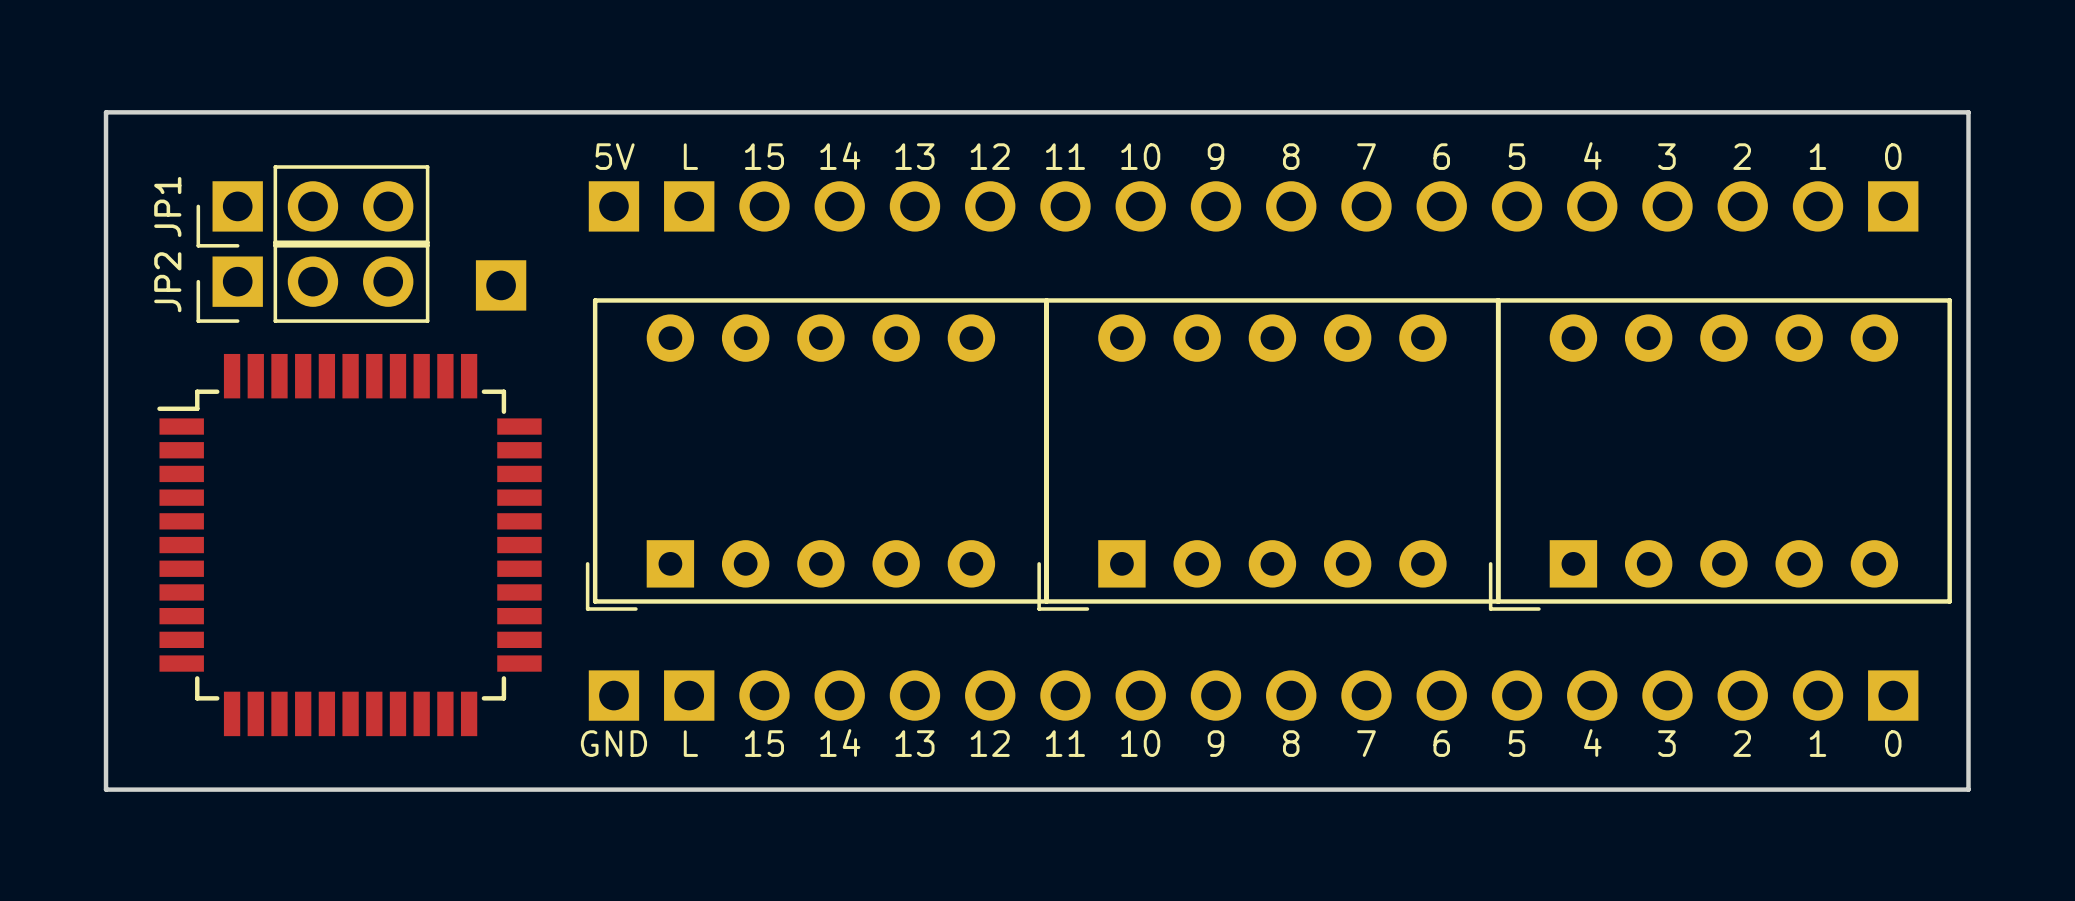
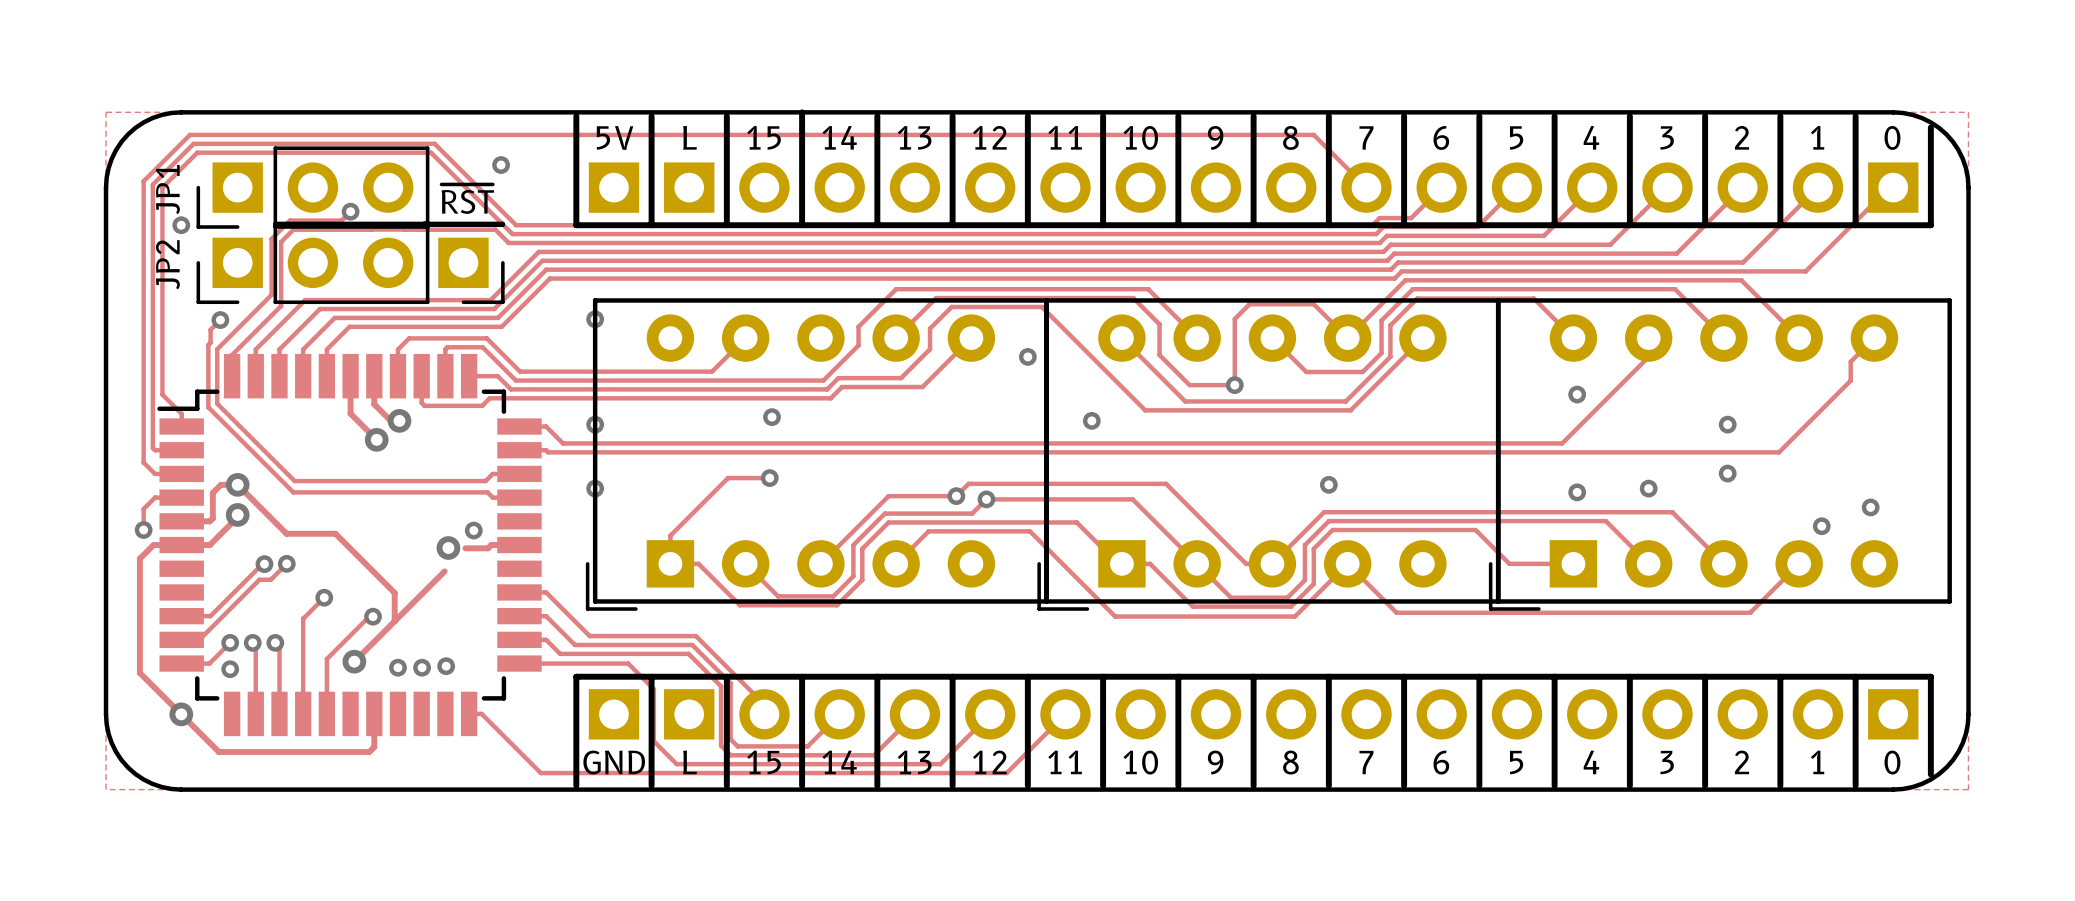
board edge: (181, 112) (106, 112) (106, 187) -> (181, 112) (152, 118) (128, 134) (111, 158) (106, 187)
line: none -> (802, 112) (802, 225)
board edge: (1893, 112) (1968, 112) (1968, 187) -> (1893, 112) (1922, 118) (1946, 134) (1962, 158) (1968, 187)
line: none -> (576, 116) (576, 225) (1930, 225) (1930, 127)
line: none -> (651, 116) (651, 225)
line: none -> (726, 116) (726, 225)
line: none -> (877, 116) (877, 225)
line: none -> (952, 116) (952, 225)
line: none -> (1027, 116) (1027, 225)
line: none -> (1103, 116) (1103, 225)
line: none -> (1178, 116) (1178, 225)
line: none -> (1253, 116) (1253, 225)
line: none -> (1328, 116) (1328, 225)
line: none -> (1404, 116) (1404, 225)
line: none -> (1479, 116) (1479, 225)
line: none -> (1554, 116) (1554, 225)
line: none -> (1629, 116) (1629, 225)
line: none -> (1705, 116) (1705, 225)
line: none -> (1780, 116) (1780, 225)
line: none -> (1855, 116) (1855, 225)
text position: 5V (615, 156) -> 5V (615, 137)
text position: L (690, 156) -> L (690, 137)
text position: 15 (764, 156) -> 15 (764, 137)
text position: 14 (840, 156) -> 14 (839, 137)
text position: 13 (914, 156) -> 13 (914, 137)
text position: 12 (990, 156) -> 12 (989, 137)
text position: 11 (1065, 156) -> 11 (1065, 137)
text position: 10 (1140, 156) -> 10 (1140, 137)
text position: 9 (1215, 156) -> 9 (1215, 137)
text position: 8 (1291, 156) -> 8 (1290, 137)
text position: 7 (1366, 156) -> 7 (1366, 137)
text position: 6 (1441, 156) -> 6 (1441, 137)
text position: 5 (1516, 156) -> 5 (1516, 137)
text position: 4 (1592, 156) -> 4 (1591, 137)
text position: 3 (1666, 156) -> 3 (1667, 137)
text position: 2 (1742, 156) -> 2 (1742, 137)
text position: 1 (1817, 156) -> 1 (1817, 137)
text position: 0 (1893, 156) -> 0 (1892, 137)
via: none -> (501, 165)
track: none -> (1366, 187) (1313, 134) (189, 134) (143, 181) (143, 462) (155, 473) (181, 473)
track: none -> (1441, 187) (1411, 218) (1379, 218) (1372, 225) (516, 225) (434, 143) (193, 143) (152, 184) (152, 448) (155, 450) (181, 450)
track: none -> (1516, 187) (1477, 226) (1383, 226) (1376, 234) (512, 234) (431, 152) (197, 152) (162, 187) (162, 394) (181, 413) (181, 426)
track: none -> (1592, 187) (1543, 235) (1387, 235) (1379, 243) (508, 243) (495, 229) (404, 229)
track: none -> (1667, 187) (1610, 244) (1390, 244) (1383, 251) (538, 251) (490, 300) (305, 300) (255, 349) (255, 376)
track: none -> (1742, 187) (1676, 253) (1394, 253) (1387, 260) (542, 260) (494, 309) (319, 309) (279, 349) (279, 376)
track: none -> (1817, 187) (1743, 262) (1398, 262) (1390, 269) (546, 269) (498, 317) (334, 317) (303, 349) (303, 376)
track: none -> (1893, 187) (1889, 187) (1805, 271) (1401, 271) (1394, 278) (549, 278) (501, 326) (349, 326) (326, 349) (326, 376)
text: none -> ~{RST} (467, 199)
JP1 position: (312, 206) -> (312, 187)
part position: (613, 206) -> (613, 187)
part position: (689, 206) -> (689, 187)
part position: (1328, 206) -> (1328, 187)
track: none -> (350, 211) (341, 220) (289, 220) (271, 238) (271, 294) (217, 349) (217, 403) (294, 481) (485, 481) (492, 473) (519, 473)
via: none -> (350, 211)
via: none -> (181, 225)
track: none -> (371, 229) (293, 229) (281, 242) (281, 305) (232, 355) (232, 376)
track: none -> (372, 229) (404, 229)
JP2 position: (312, 281) -> (312, 262)
part side: bottom (501, 285) -> top (463, 262)
via: none -> (595, 319)
track: none -> (220, 320) (210, 329) (210, 342) (208, 344) (208, 407) (293, 492) (487, 492) (492, 497) (519, 497)
via: none -> (220, 320)
track: none -> (745, 338) (712, 371) (520, 371) (486, 338) (409, 338) (397, 349) (397, 376)
track: none -> (896, 338) (936, 298) (1133, 298) (1159, 324) (1159, 355) (1189, 385) (1234, 385) (1234, 319) (1249, 304) (1313, 304) (1347, 338) (1405, 280) (1741, 280) (1799, 338)
track: none -> (971, 338) (922, 387) (842, 387) (830, 398) (489, 398) (482, 405) (424, 405) (421, 402) (421, 376)
track: none -> (1121, 338) (1185, 401) (1345, 401) (1390, 356) (1390, 325) (1417, 298) (1533, 298) (1573, 338)
track: none -> (1197, 338) (1148, 289) (896, 289) (858, 326) (858, 345) (823, 380) (515, 380) (482, 347) (447, 347) (445, 349) (445, 376)
track: none -> (1272, 338) (1306, 371) (1362, 371) (1381, 353) (1381, 320) (1412, 289) (1675, 289) (1723, 338)
track: none -> (1422, 338) (1350, 410) (1145, 410) (1041, 306) (951, 306) (930, 328) (930, 349) (901, 378) (838, 378) (827, 389) (511, 389) (497, 376) (469, 376)
track: none -> (1648, 338) (1648, 356) (1562, 443) (563, 443) (546, 426) (519, 426)
track: none -> (1874, 338) (1850, 361) (1850, 380) (1779, 452) (548, 452) (546, 450) (519, 450)
via: none -> (1027, 356)
track: none -> (350, 376) (350, 413) (376, 439)
track: none -> (374, 376) (374, 404) (390, 420) (399, 420)
via: none -> (1234, 385)
via: none -> (1577, 394)
via: none -> (771, 417)
via: none -> (399, 420)
via: none -> (1091, 420)
via: none -> (595, 424)
via: none -> (1727, 424)
via: none -> (376, 439)
via: none -> (1727, 473)
track: none -> (769, 478) (728, 478) (670, 535) (670, 563) (698, 563) (739, 605) (837, 605) (862, 579) (862, 548) (888, 522) (1076, 522) (1118, 563) (1150, 563) (1192, 606) (1291, 606) (1313, 583) (1313, 548) (1332, 529) (1475, 529) (1509, 563) (1573, 563)
via: none -> (769, 478)
via: none -> (237, 484)
via: none -> (1328, 484)
via: none -> (595, 488)
via: none -> (1648, 488)
via: none -> (1577, 492)
via: none -> (956, 496)
track: none -> (181, 497) (155, 497) (143, 509) (143, 529)
via: none -> (986, 499)
via: none -> (1870, 507)
track: none -> (237, 514) (237, 517) (209, 545) (153, 545) (139, 558) (139, 672) (218, 751) (369, 751) (374, 747) (374, 713)
via: none -> (237, 514)
track: none -> (181, 521) (209, 521) (212, 518) (212, 492) (220, 484) (237, 484) (286, 533) (335, 533) (394, 592) (394, 621)
via: none -> (1821, 526)
via: none -> (143, 529)
via: none -> (473, 530)
track: none -> (519, 545) (491, 545) (488, 548) (465, 548)
via: none -> (448, 548)
track: none -> (286, 563) (270, 579) (259, 579) (199, 639) (181, 639)
via: none -> (286, 563)
track: none -> (745, 563) (778, 596) (833, 596) (853, 576) (853, 545) (884, 513) (972, 513) (986, 499) (1132, 499) (1231, 597) (1287, 597) (1304, 580) (1304, 545) (1328, 521) (1605, 521) (1648, 563)
track: none -> (820, 563) (888, 496) (956, 496) (968, 483) (1166, 483) (1246, 563) (1272, 563) (1324, 512) (1672, 512) (1723, 563)
track: none -> (896, 563) (928, 531) (1030, 531) (1115, 616) (1294, 616) (1347, 563) (1396, 612) (1750, 612) (1799, 563)
track: none -> (264, 564) (210, 616) (181, 616)
via: none -> (264, 564)
track: none -> (444, 571) (350, 665)
track: none -> (519, 592) (546, 592) (589, 636) (695, 636) (764, 704) (764, 714)
track: none -> (324, 597) (303, 618) (303, 713)
via: none -> (324, 597)
track: none -> (373, 616) (369, 616) (326, 659) (326, 713)
via: none -> (373, 616)
track: none -> (519, 616) (546, 616) (574, 644) (692, 644) (730, 683) (730, 739) (737, 746) (807, 746) (839, 714)
track: none -> (519, 639) (546, 639) (560, 653) (688, 653) (721, 686) (721, 745) (730, 755) (874, 755) (914, 714)
track: none -> (230, 642) (209, 663) (181, 663)
via: none -> (230, 642)
track: none -> (252, 642) (255, 645) (255, 713)
via: none -> (252, 642)
track: none -> (275, 642) (279, 647) (279, 713)
via: none -> (275, 642)
via: none -> (354, 661)
track: none -> (519, 663) (628, 663) (653, 689) (653, 741) (676, 764) (940, 764) (990, 714)
via: none -> (446, 666)
via: none -> (397, 667)
via: none -> (422, 667)
via: none -> (230, 669)
line: none -> (651, 676) (651, 785)
line: none -> (726, 676) (726, 785)
line: none -> (802, 676) (802, 785)
line: none -> (877, 676) (877, 785)
line: none -> (952, 676) (952, 785)
line: none -> (1027, 676) (1027, 785)
line: none -> (1103, 676) (1103, 785)
line: none -> (1178, 676) (1178, 785)
line: none -> (1253, 676) (1253, 785)
line: none -> (1328, 676) (1328, 785)
line: none -> (1404, 676) (1404, 785)
line: none -> (1479, 676) (1479, 785)
line: none -> (1554, 676) (1554, 785)
line: none -> (1629, 676) (1629, 785)
line: none -> (1705, 676) (1705, 785)
line: none -> (1780, 676) (1780, 785)
line: none -> (1855, 676) (1855, 785)
part position: (613, 695) -> (613, 714)
part position: (689, 695) -> (689, 714)
part position: (1328, 695) -> (1328, 714)
track: none -> (469, 713) (481, 713) (540, 773) (1006, 773) (1065, 714)
board edge: (106, 714) (106, 789) (181, 789) -> (106, 714) (111, 743) (128, 767) (152, 783) (181, 789)
via: none -> (181, 714)
board edge: (1968, 714) (1968, 789) (1893, 789) -> (1968, 714) (1962, 743) (1946, 767) (1922, 783) (1893, 789)
text position: GND (613, 743) -> GND (614, 762)
text position: L (690, 743) -> L (690, 762)
text position: 15 (764, 743) -> 15 (764, 762)
text position: 14 (840, 743) -> 14 (839, 762)
text position: 13 (914, 743) -> 13 (914, 762)
text position: 12 (990, 743) -> 12 (989, 762)
text position: 11 (1065, 743) -> 11 (1065, 762)
text position: 10 (1140, 743) -> 10 (1140, 762)
text position: 9 (1215, 743) -> 9 (1215, 762)
text position: 8 (1291, 743) -> 8 (1290, 762)
text position: 7 (1366, 743) -> 7 (1366, 762)
text position: 6 (1441, 743) -> 6 (1441, 762)
text position: 5 (1516, 743) -> 5 (1516, 762)
text position: 4 (1592, 743) -> 4 (1591, 762)
text position: 3 (1666, 743) -> 3 (1667, 762)
text position: 2 (1742, 743) -> 2 (1742, 762)
text position: 1 (1817, 743) -> 1 (1817, 762)
text position: 0 (1893, 743) -> 0 (1892, 762)
line: none -> (1930, 774) (1930, 676) (576, 676) (576, 785)

